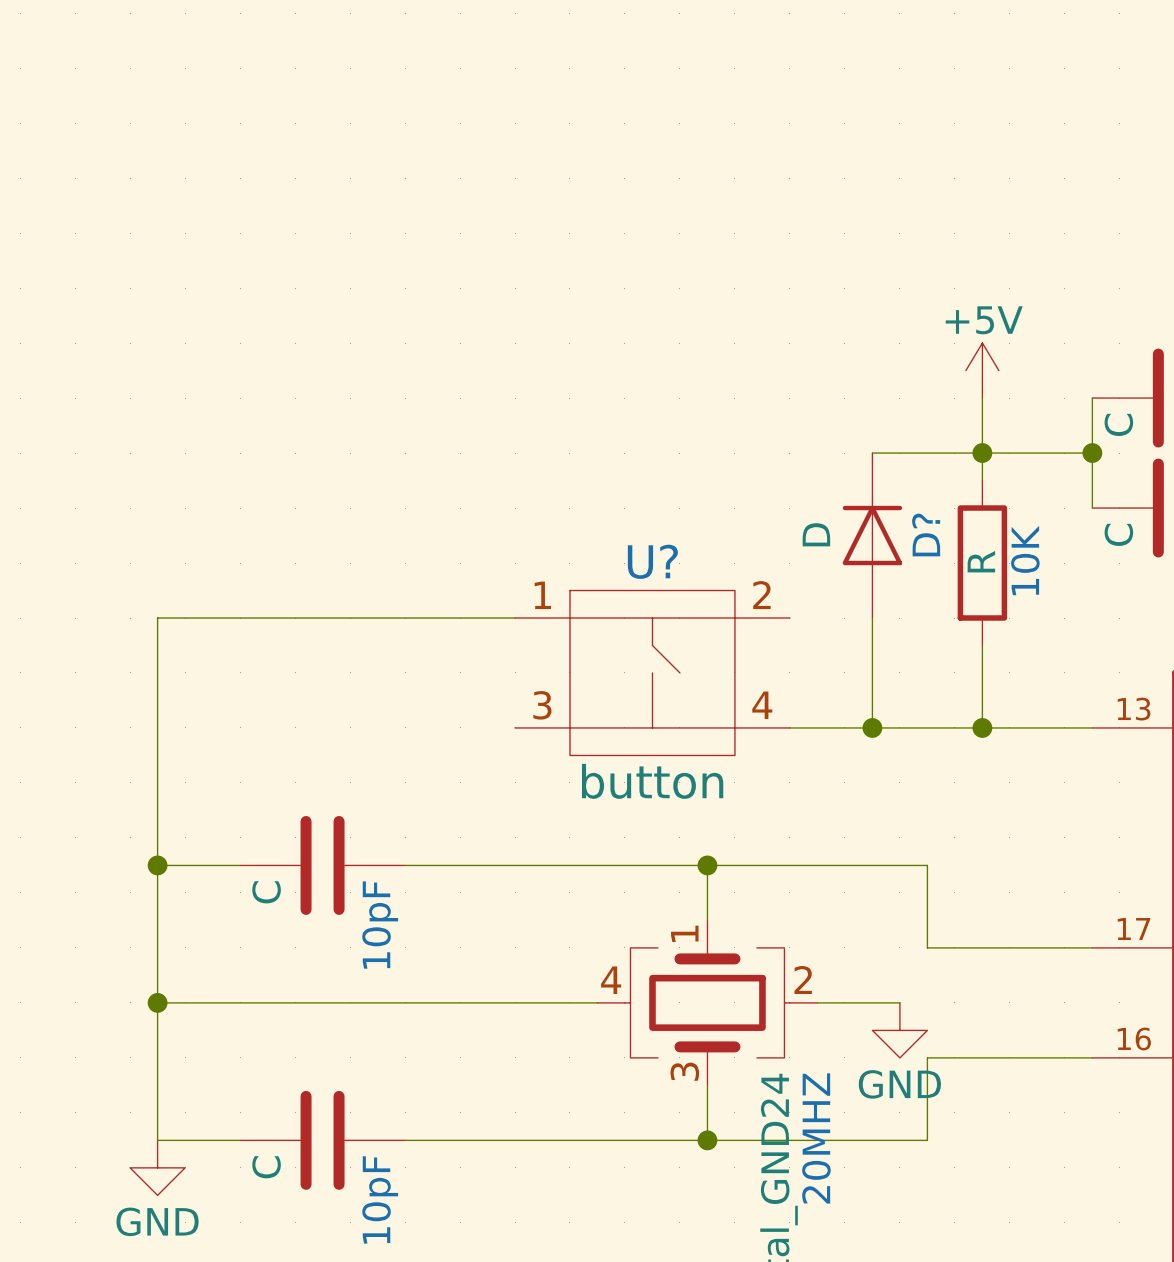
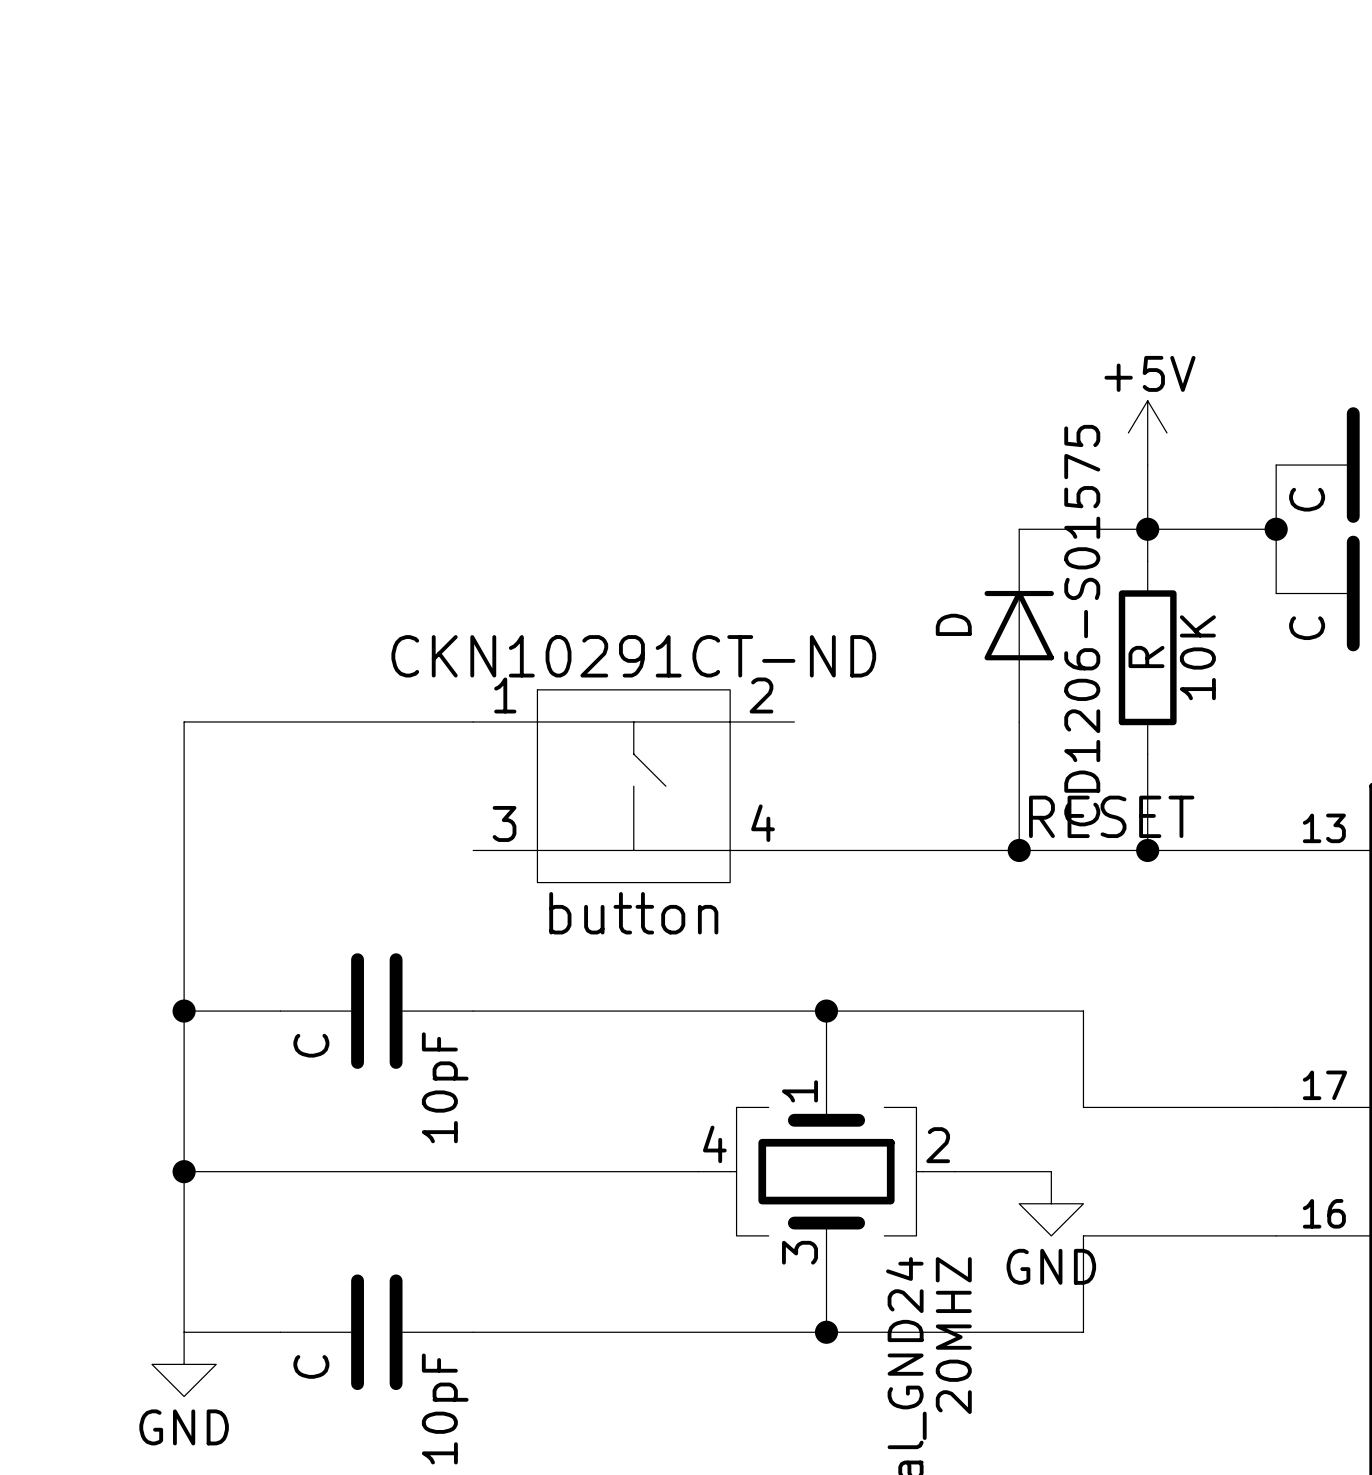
D? name: D? (926, 534) -> CD1206-S01575 (1082, 625)
CKN10291CT-ND: none -> button (633, 786)
U?: button (652, 672) -> none
label: none -> RESET (1111, 816)

